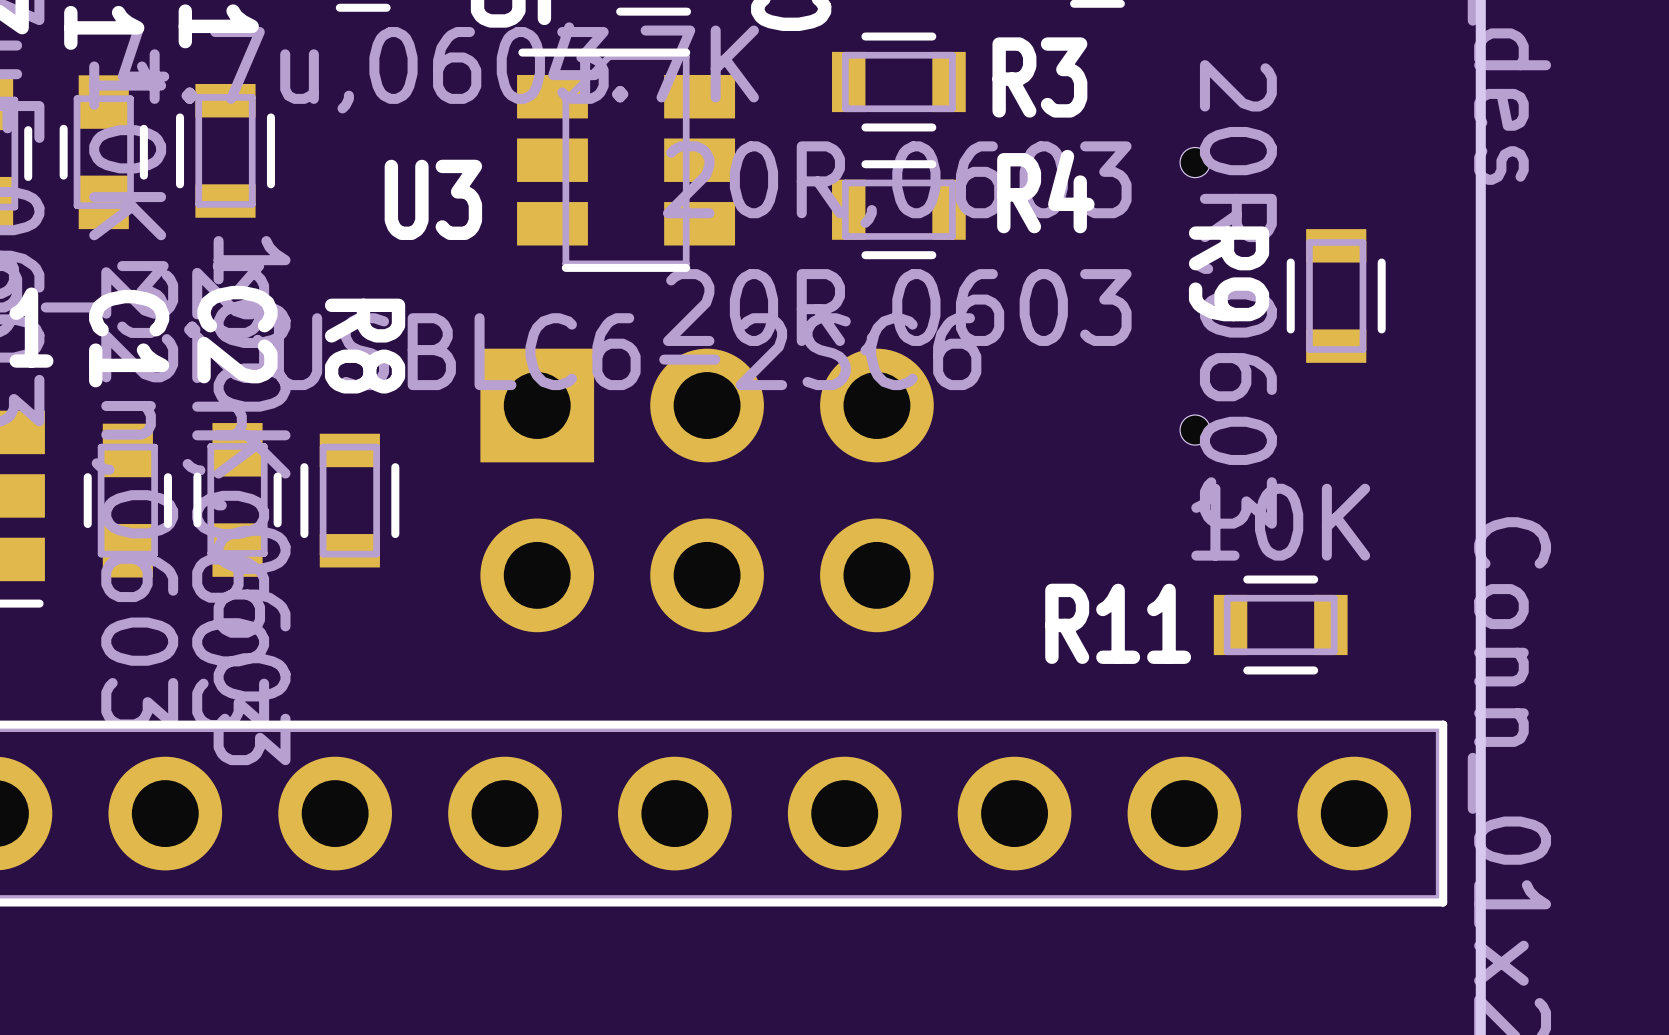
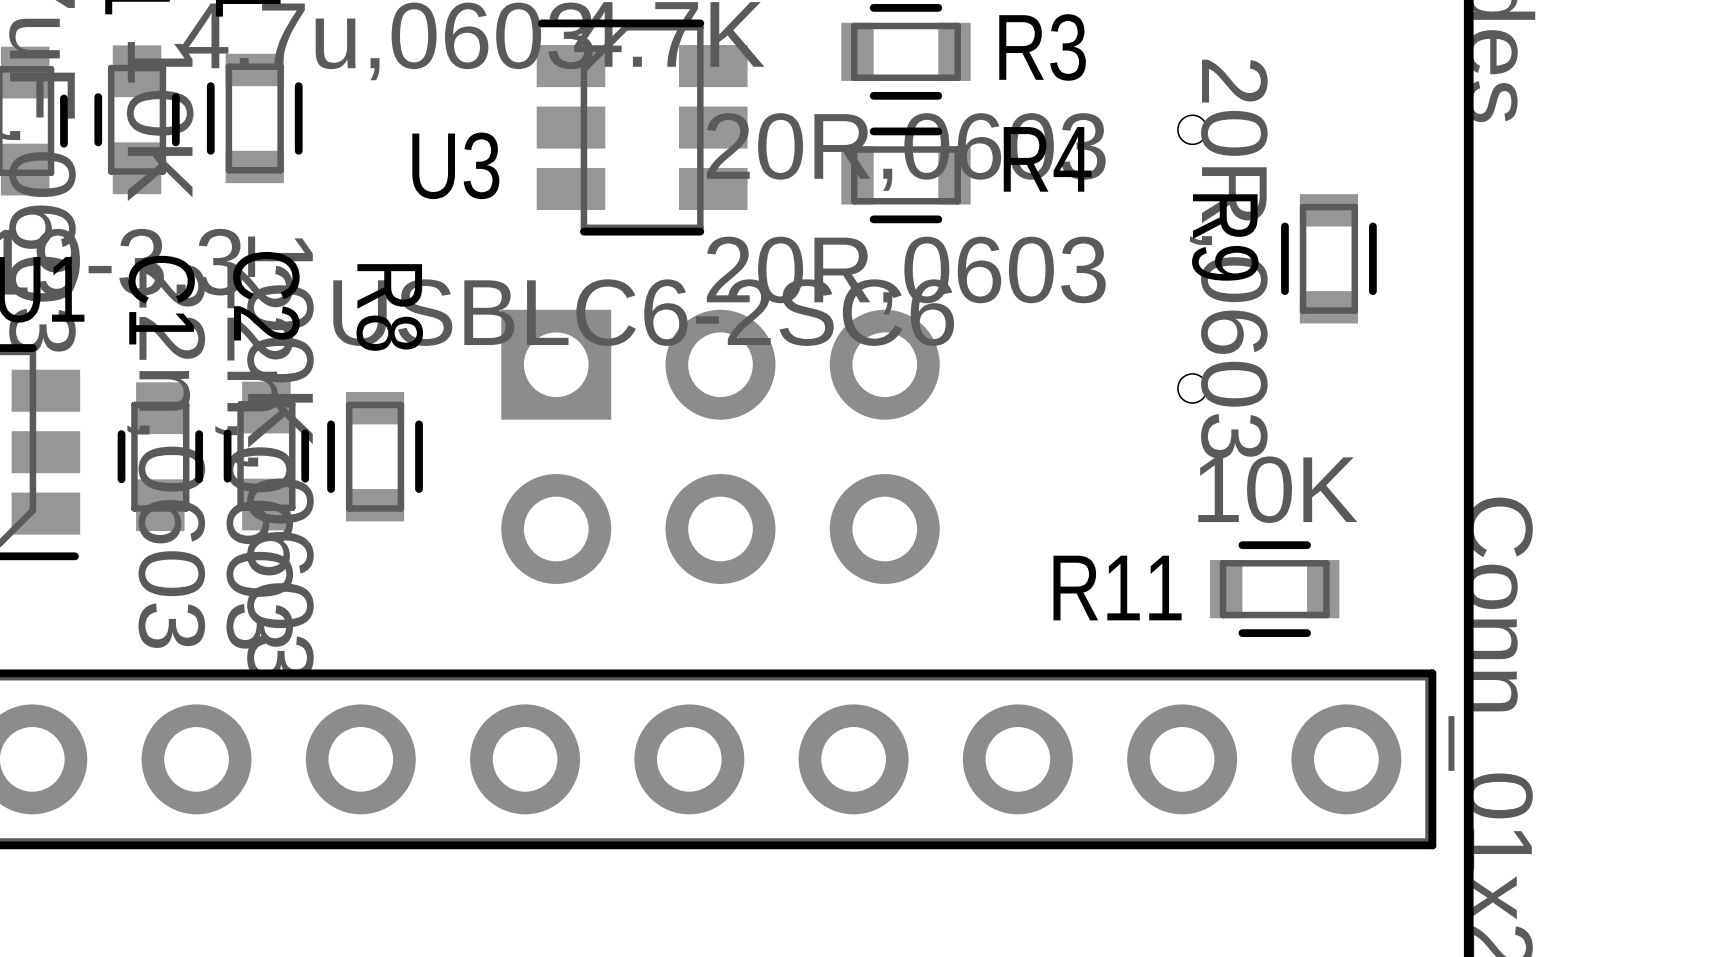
R11 position: (1280, 624) -> (1274, 589)

